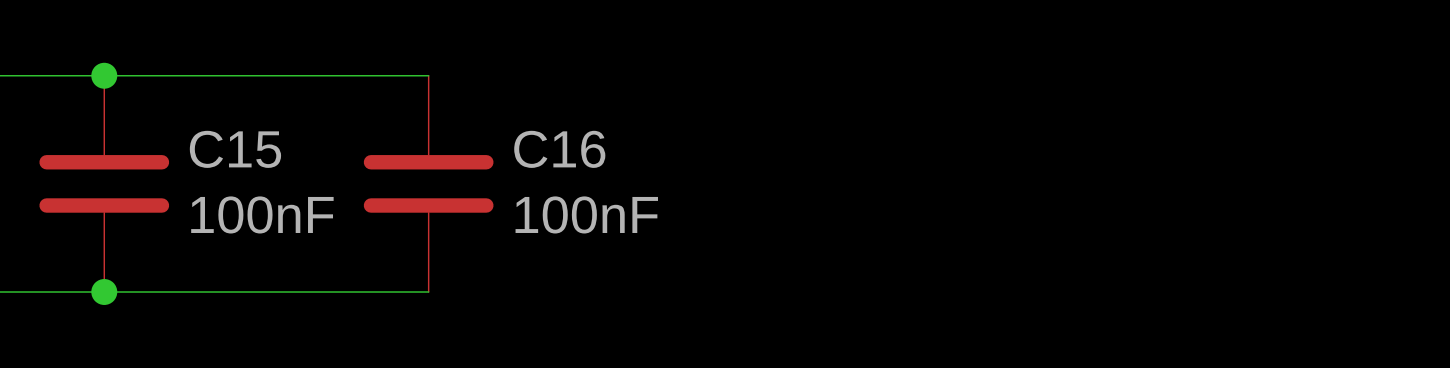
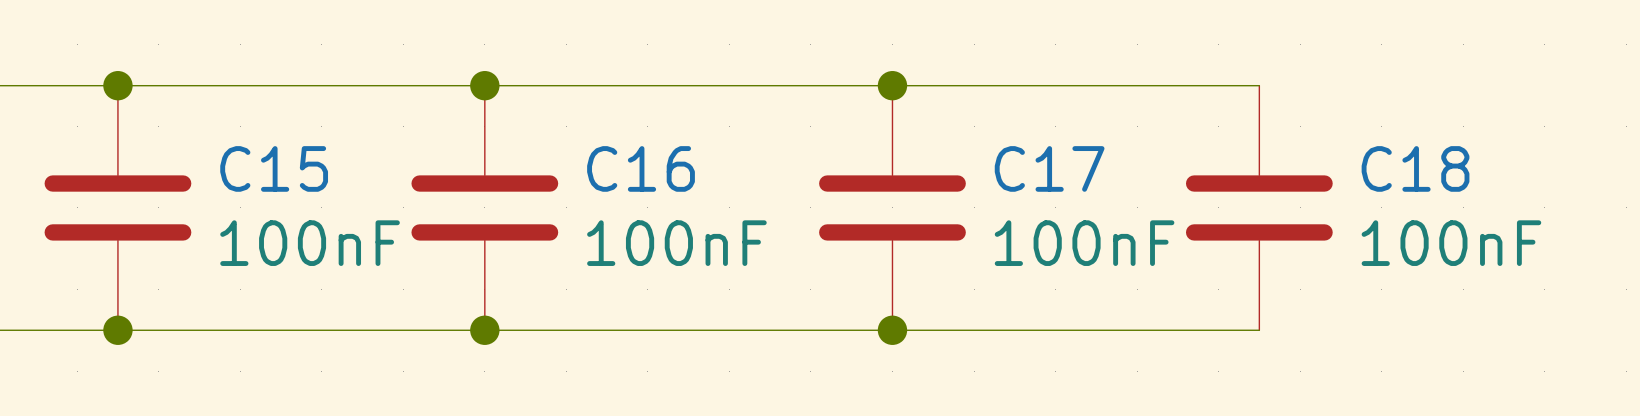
wire: none -> (484, 85) (1259, 85)
junction: none -> (484, 85)
junction: none -> (892, 85)
C17: none -> 100nF (892, 207)
C18: none -> 100nF (1259, 207)
wire: none -> (484, 330) (1259, 330)
junction: none -> (484, 330)
junction: none -> (892, 330)

